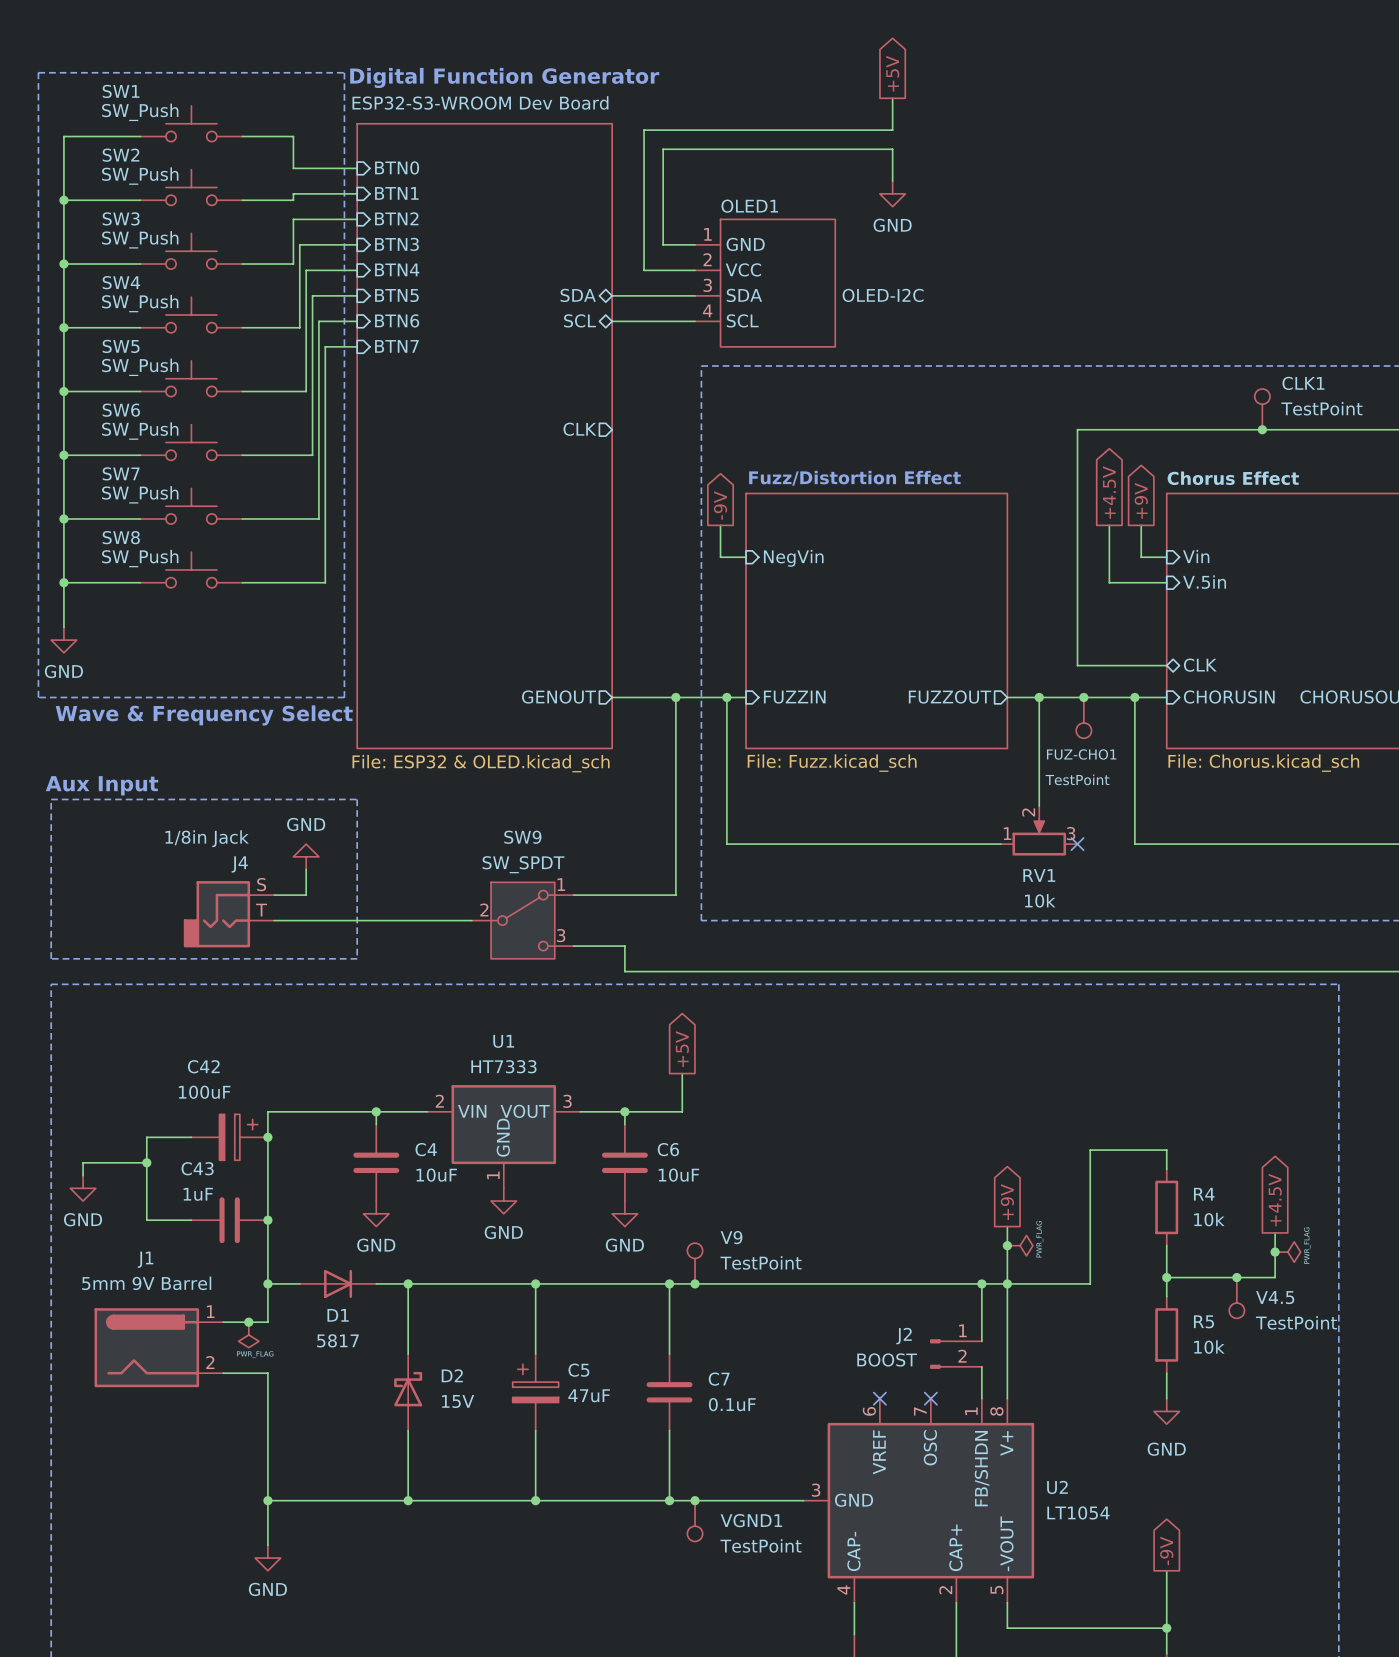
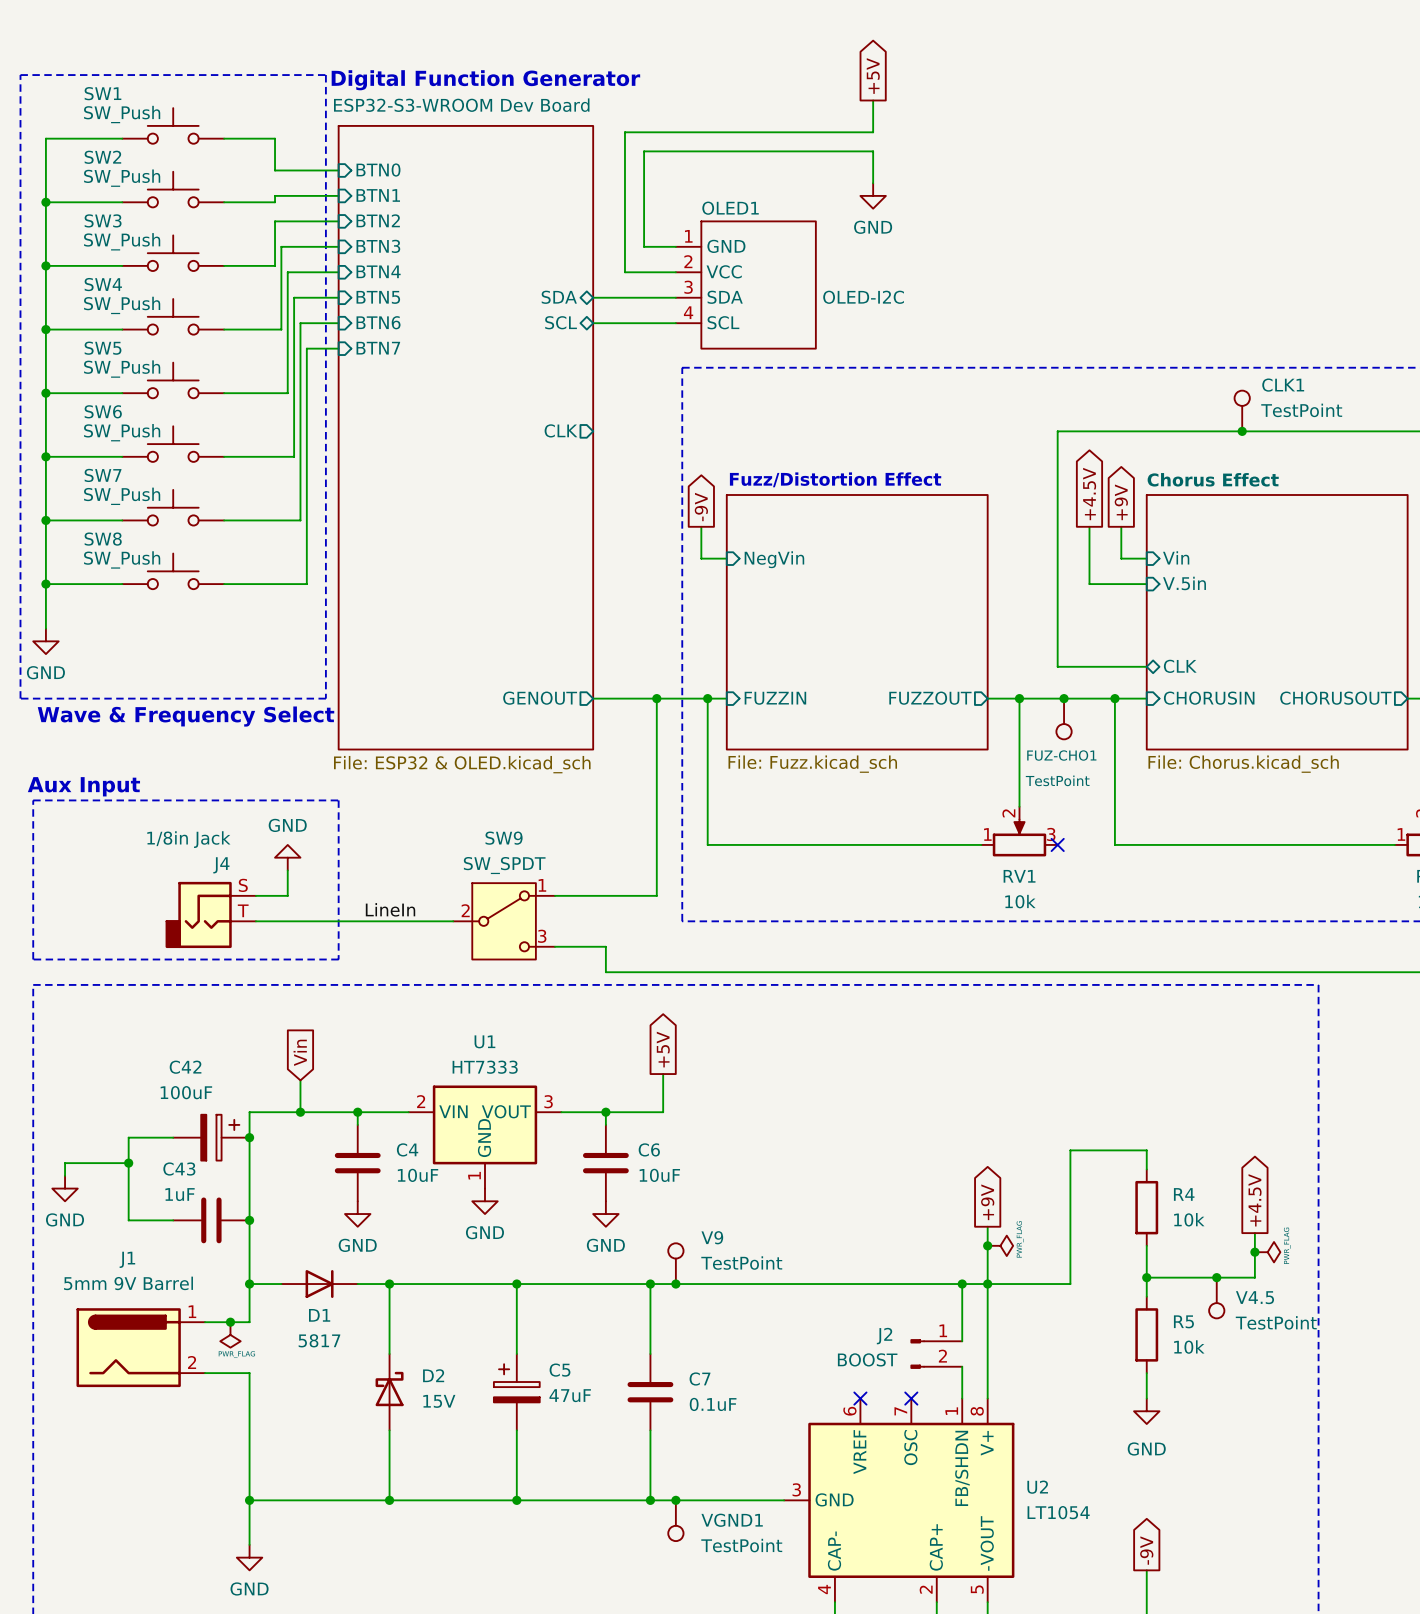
label: none -> LineIn (390, 909)
global label: none -> Vin (300, 1052)
wire: none -> (300, 1080) (300, 1112)
junction: none -> (300, 1112)

